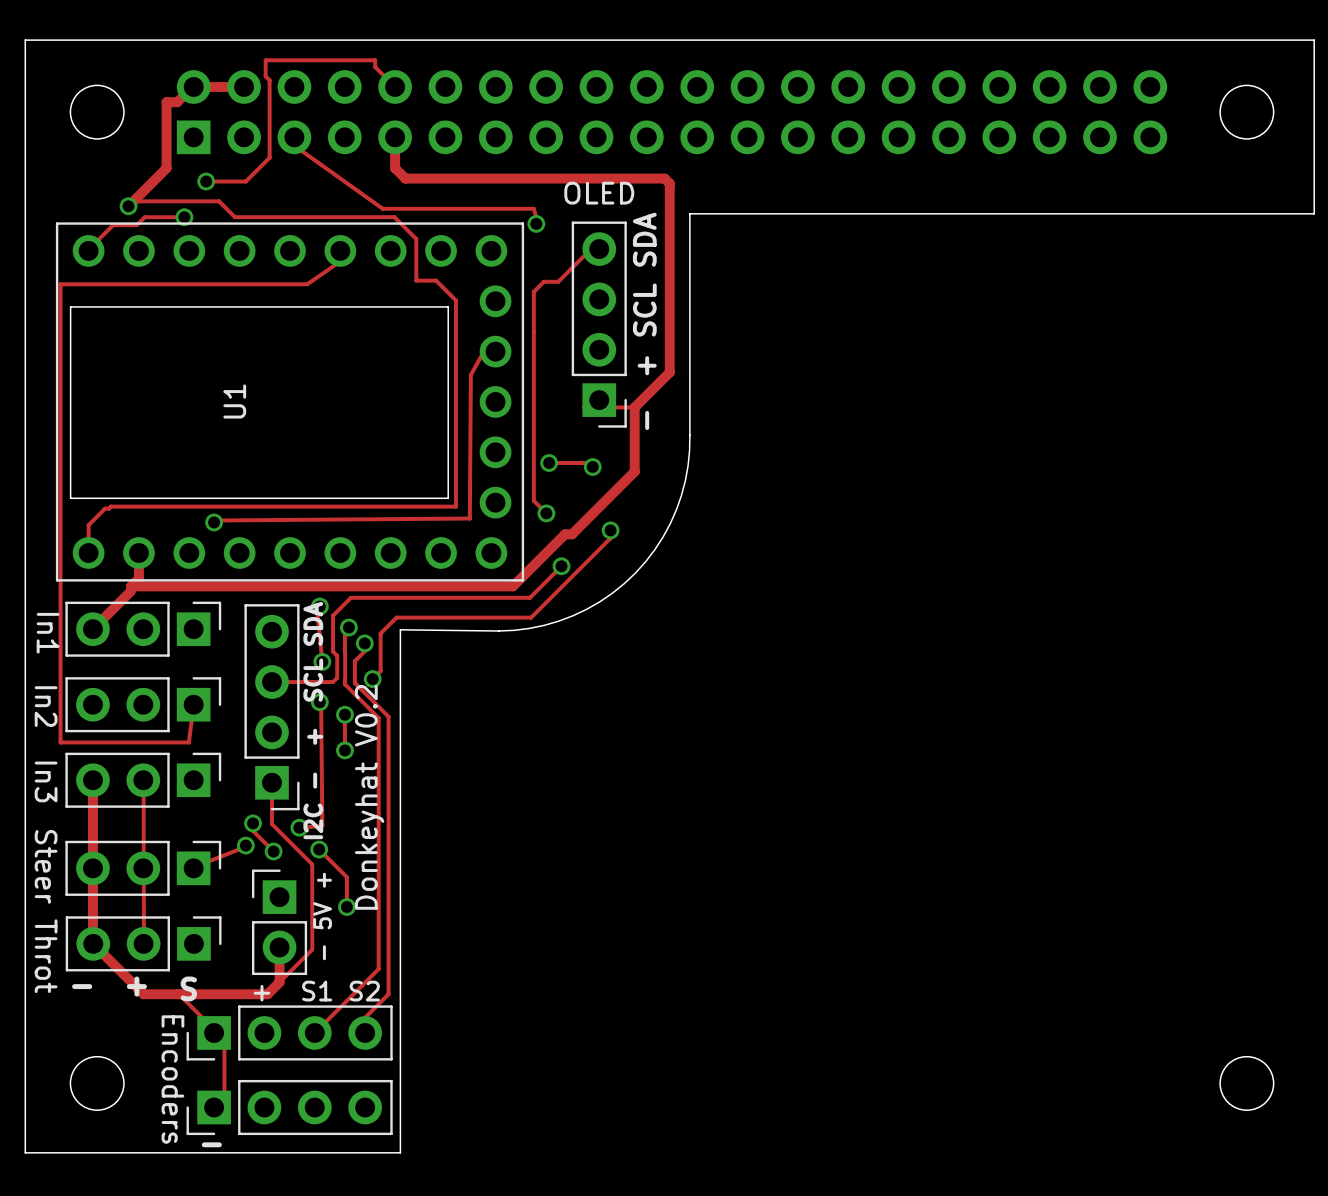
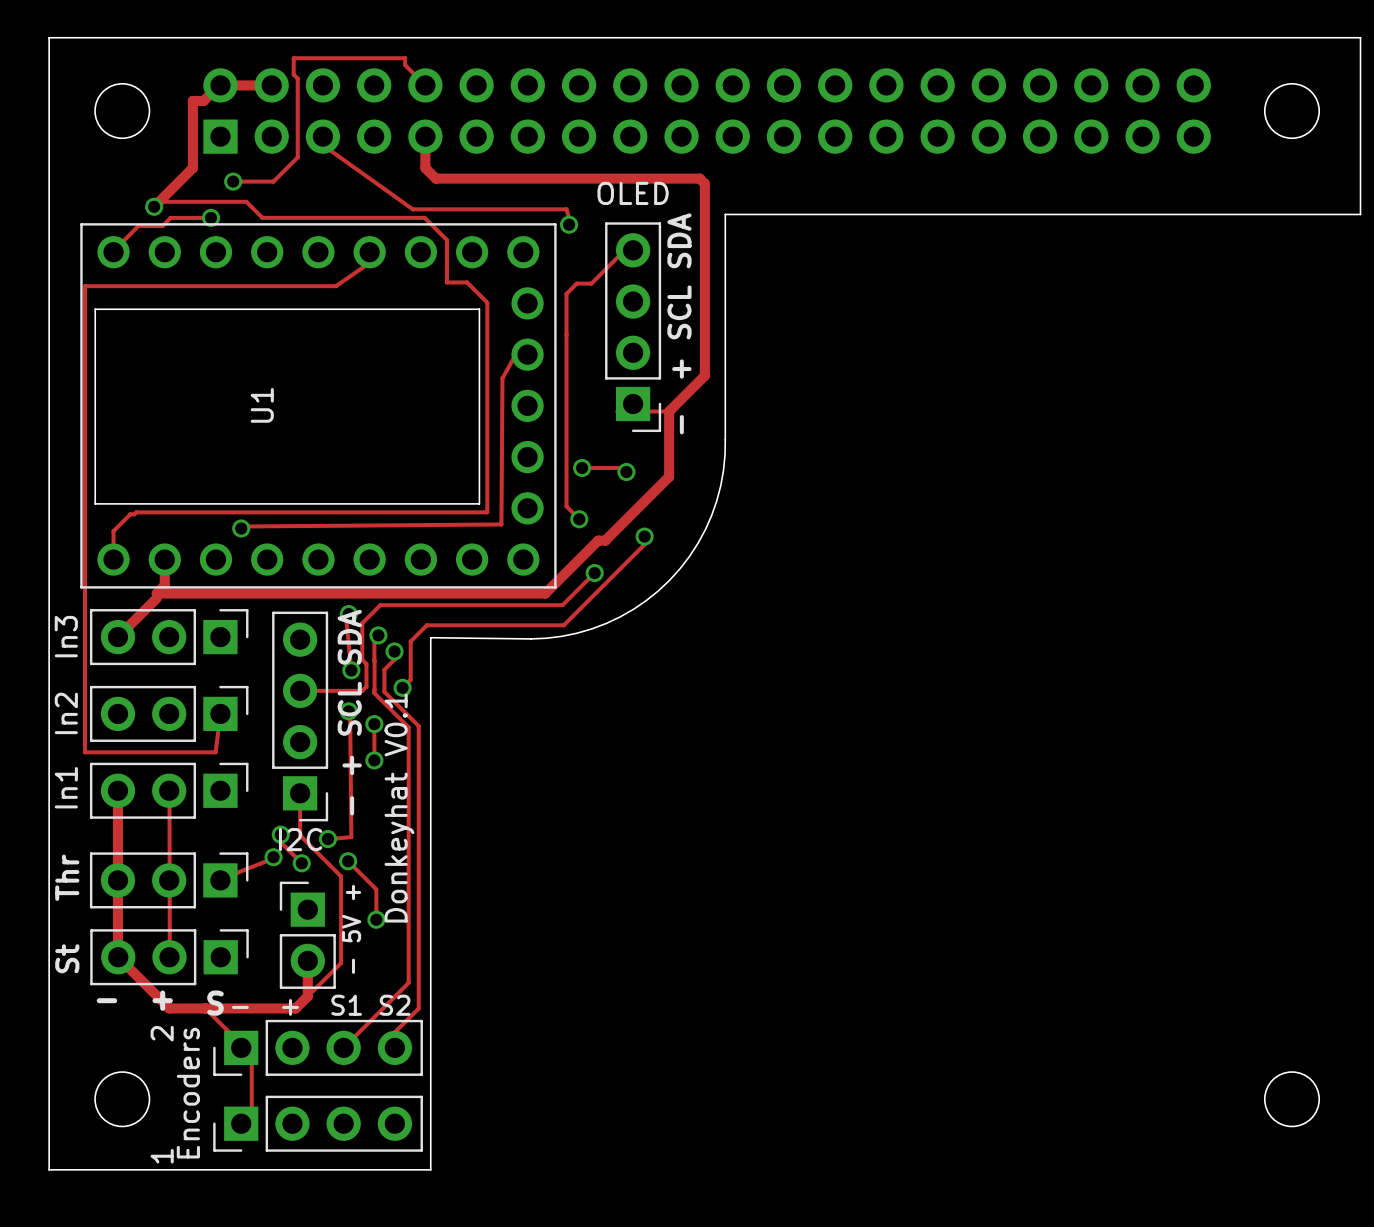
In3 name: none -> In3 (66, 636)
text: In1 (48, 633) -> none
In2 name: none -> In2 (66, 713)
text: In2 (46, 706) -> none
text: I2C - + SCL SDA (313, 720) -> - + SCL SDA (349, 712)
In1 name: none -> In1 (66, 787)
text: In3 (46, 781) -> none
text: Donkeyhat V0.2 (369, 797) -> Donkeyhat V0.1 (399, 808)
I2C name: none -> I2C (300, 839)
text: none -> Thr (67, 877)
text: Steer (46, 866) -> none
text: none -> St (67, 958)
text: Throt (46, 956) -> none
text: + S1 S2 (316, 991) -> - + S1 S2 (321, 1005)
text: none -> 2 (162, 1033)
text rotation: 0° (172, 1079) -> 180° (188, 1093)
text: none -> 1 (162, 1156)
text: - (211, 1144) -> none

